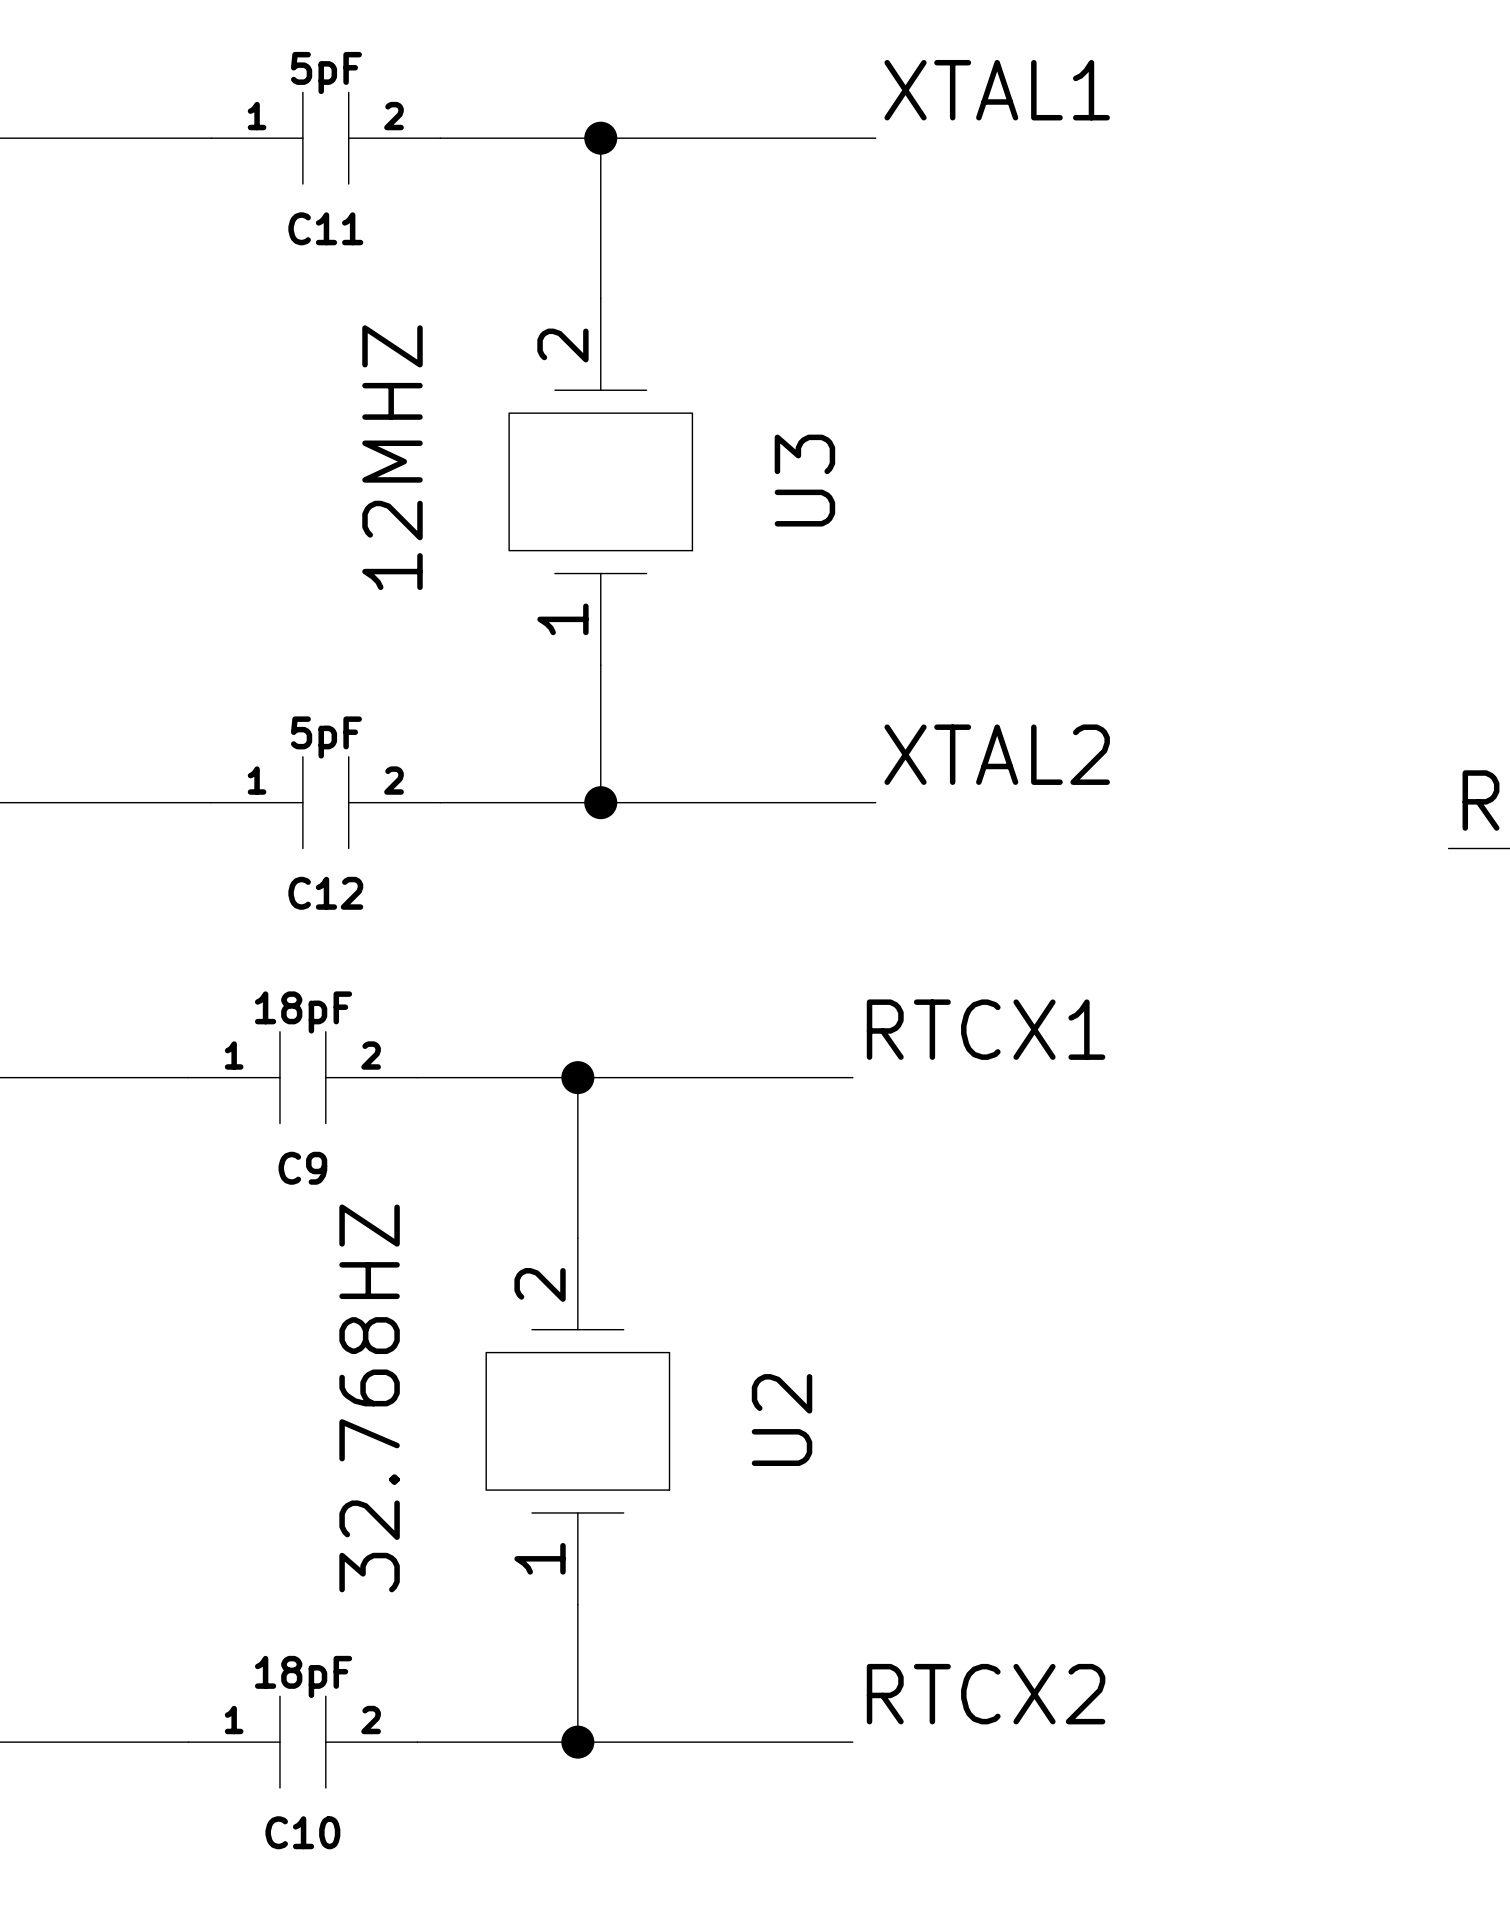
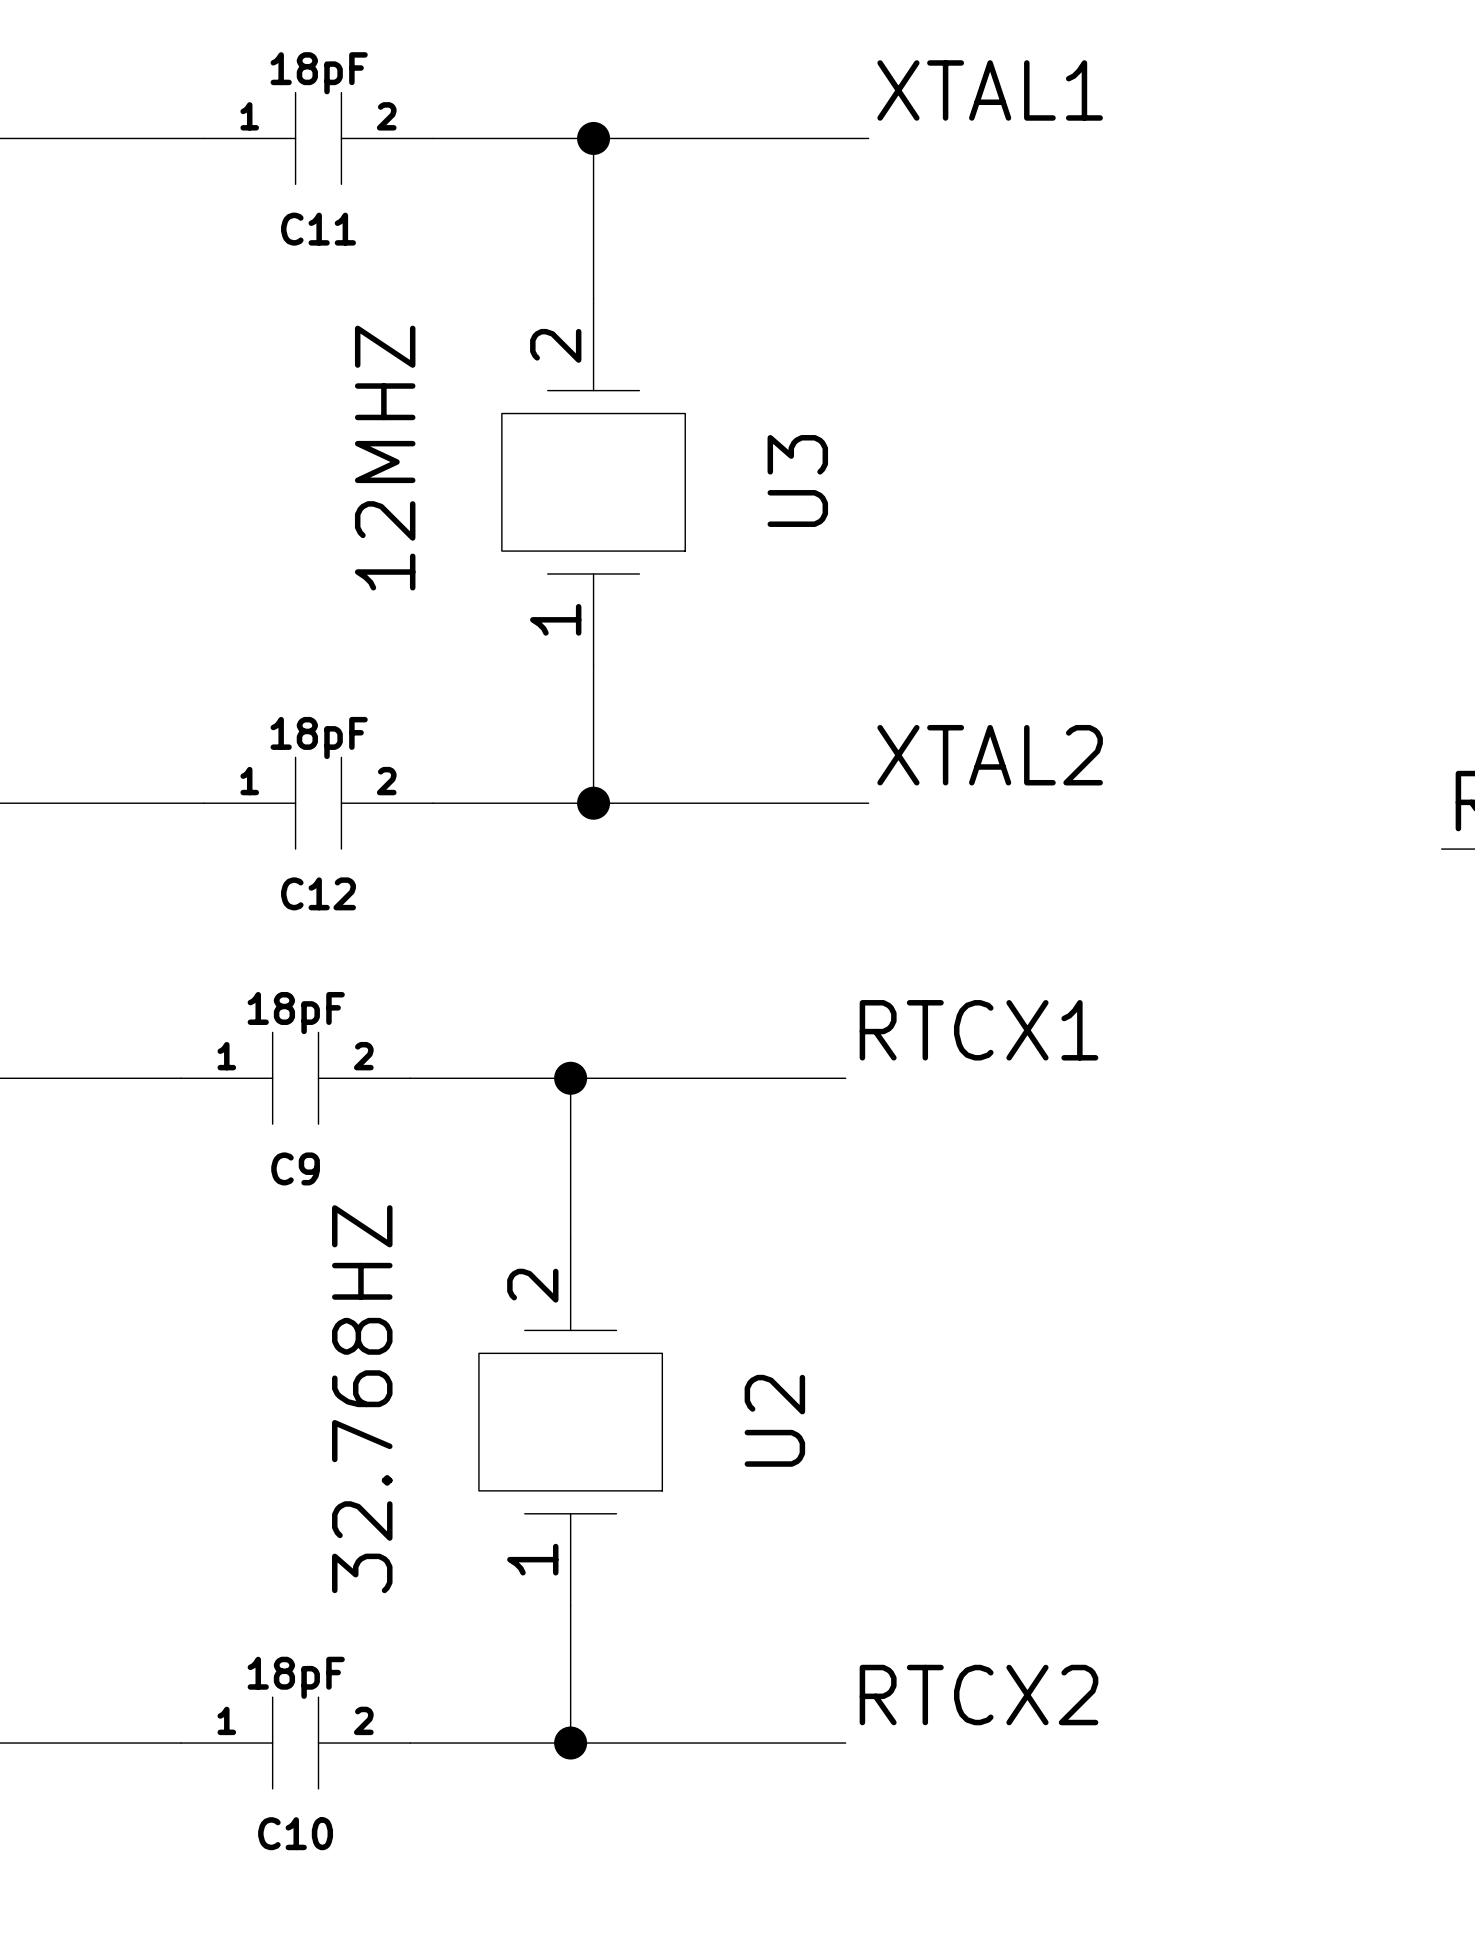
C11 value: 5pF (326, 73) -> 18pF (319, 73)
C12 value: 5pF (326, 737) -> 18pF (319, 738)

